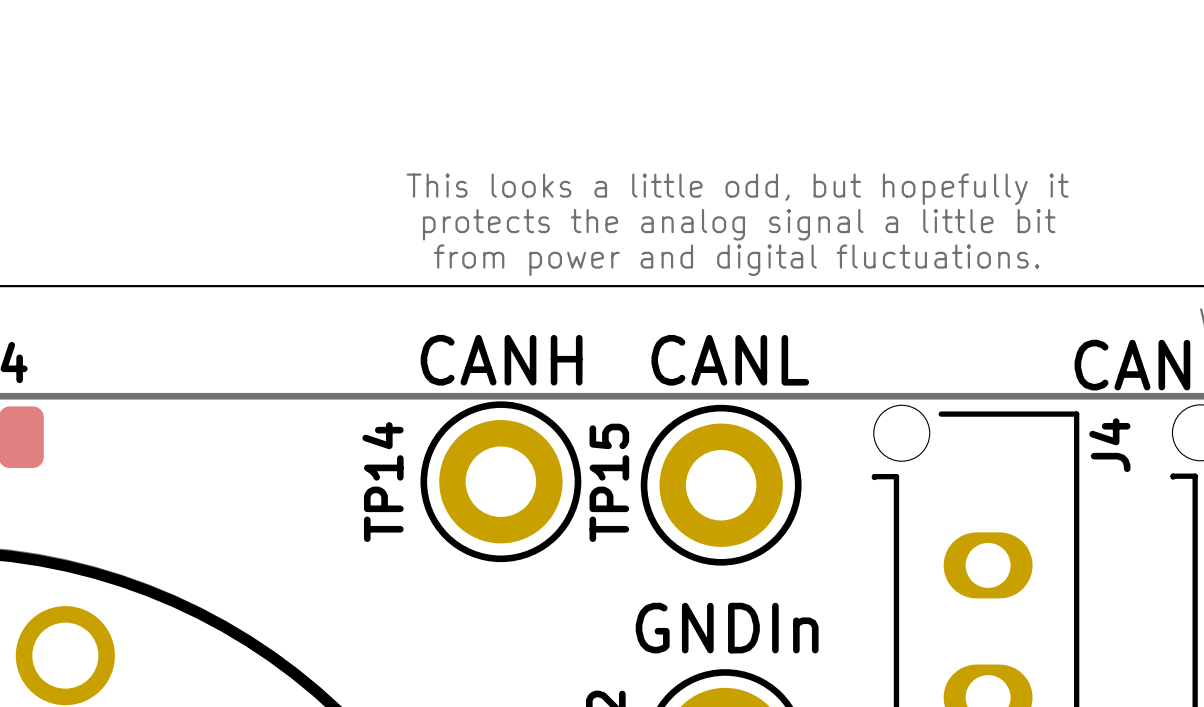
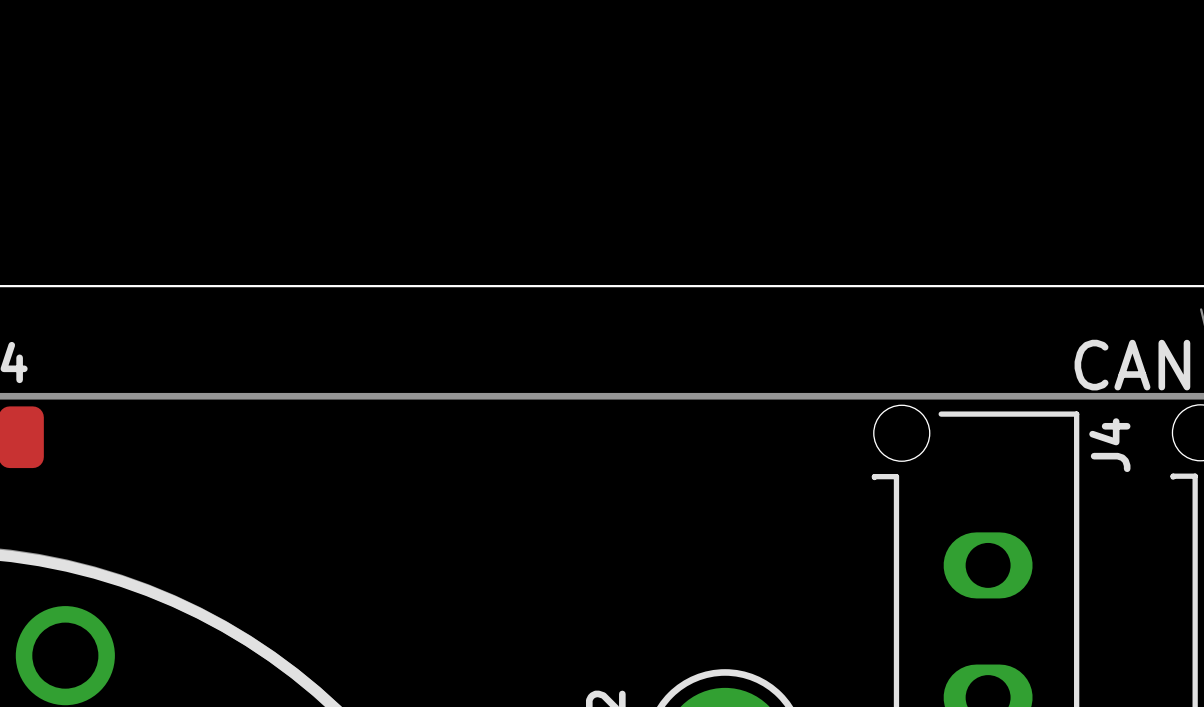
text: This looks a little odd, but hopefully it (737, 189) -> none
text: protects the analog signal a little bit (739, 224) -> none
text: from power and digital fluctuations. (736, 260) -> none
text: CANH (501, 360) -> none
text: CANL (730, 360) -> none
TP14: (500, 481) -> none
TP15: (721, 485) -> none
text: GNDIn (727, 628) -> none

